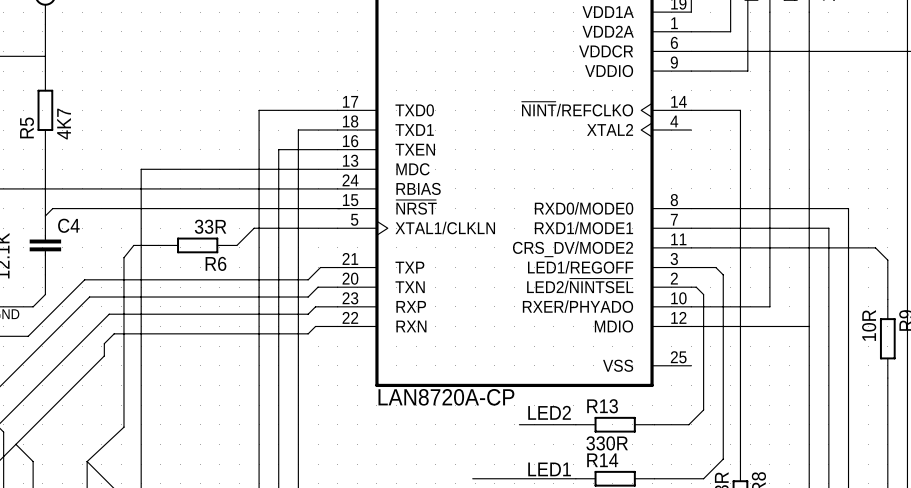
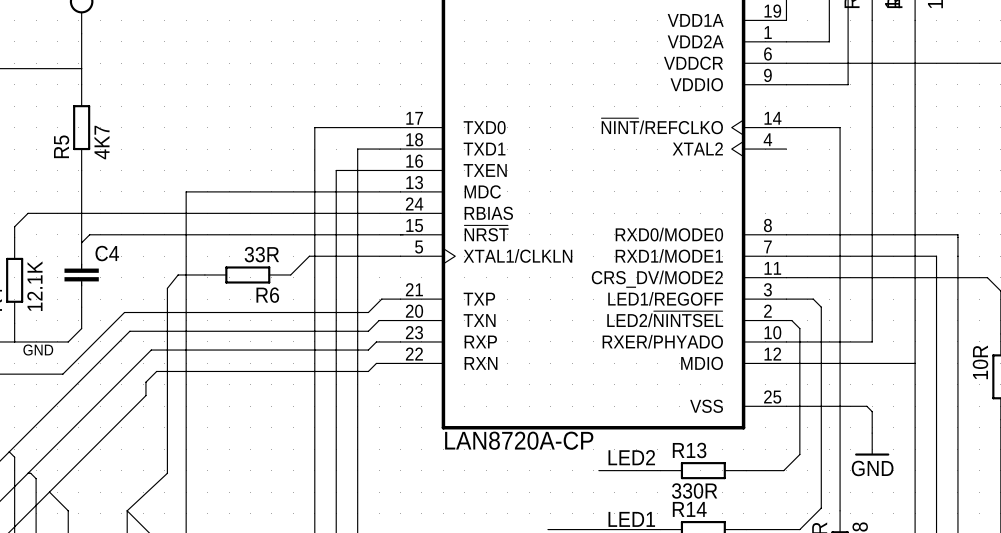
wire: none -> (786, 406) (866, 406) (872, 411) (872, 433)
power symbol: none -> GND (872, 444)

